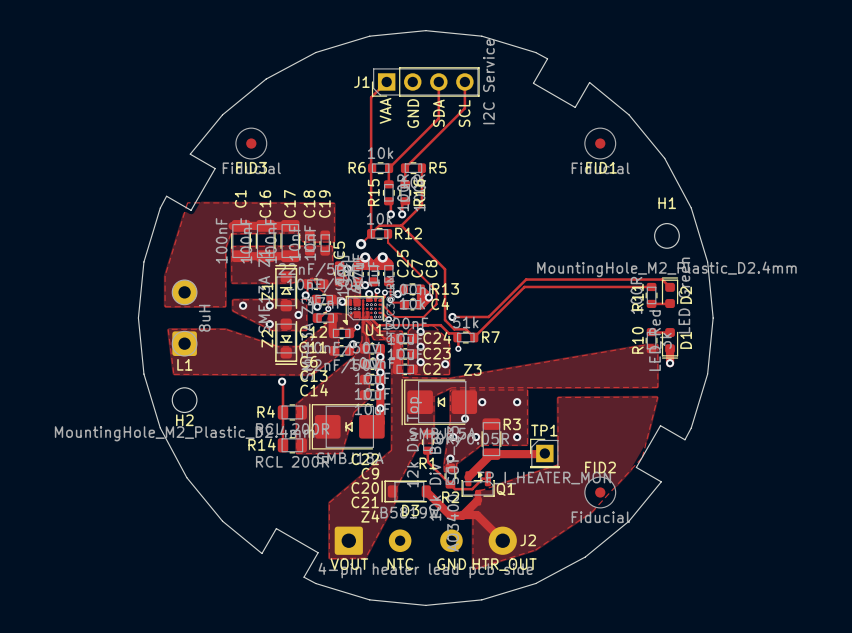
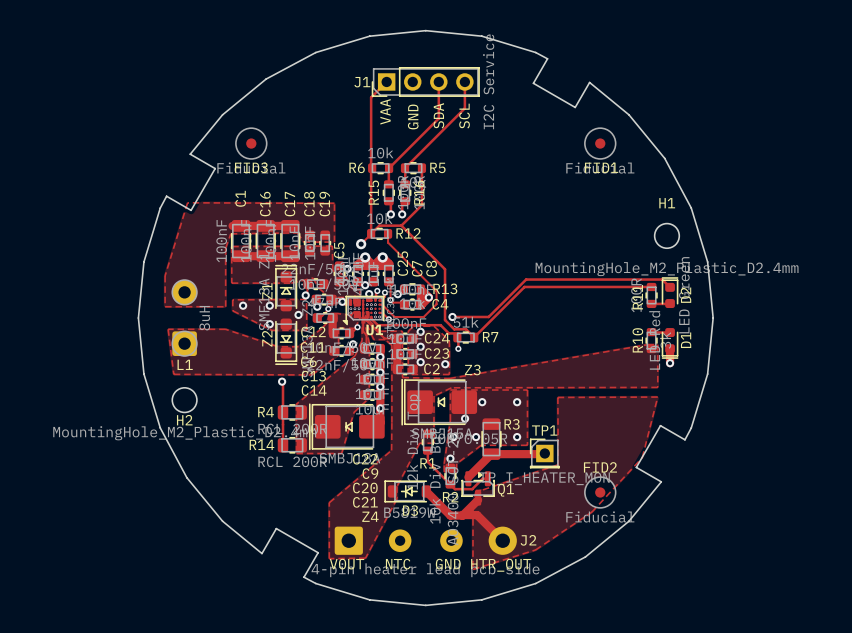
D3 footprint: [381, 480, 431, 503] -> [384, 480, 431, 503]

